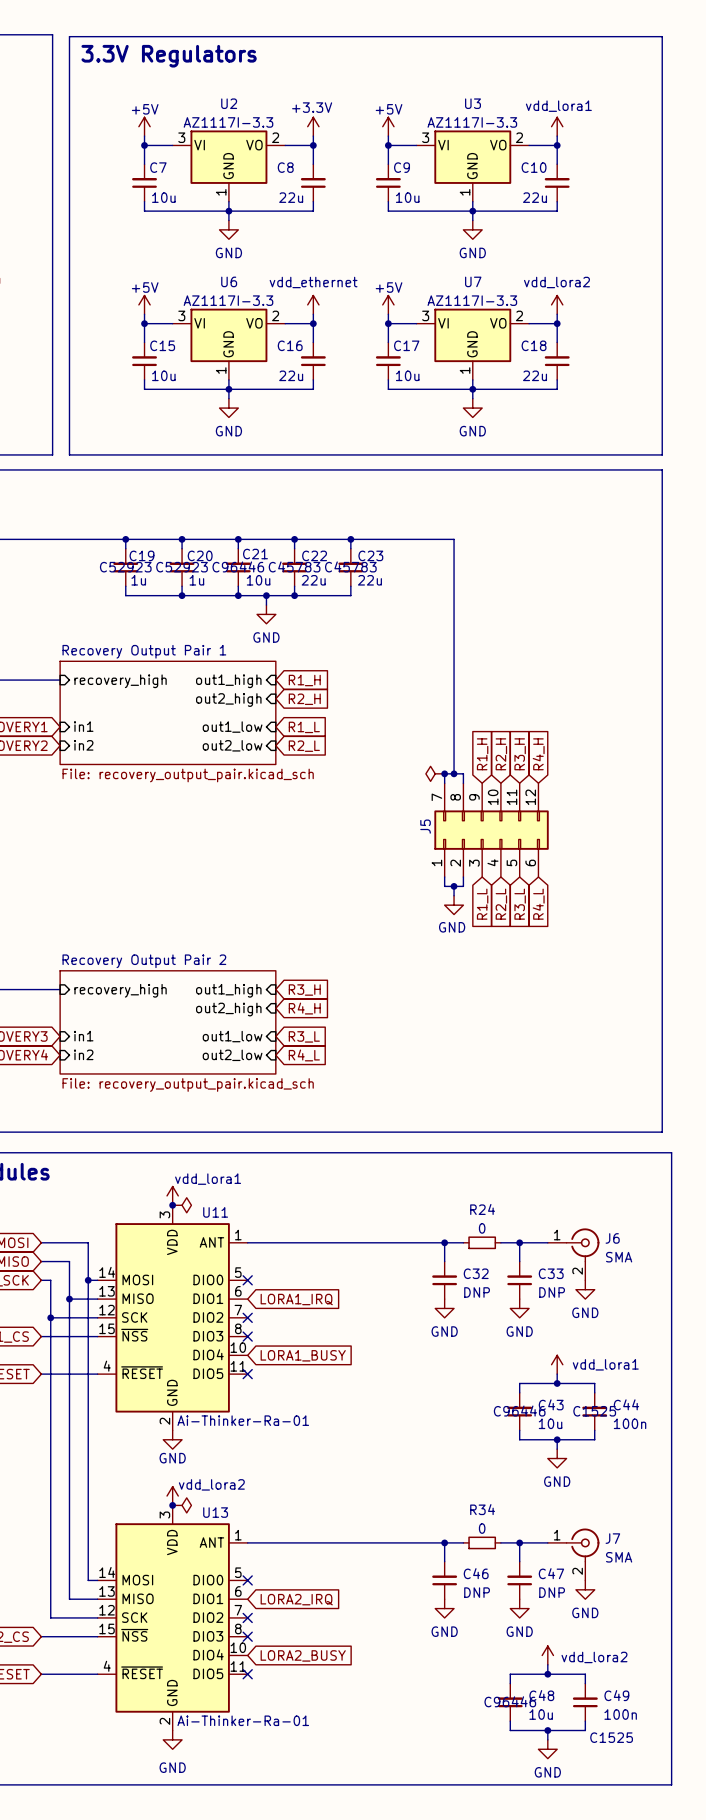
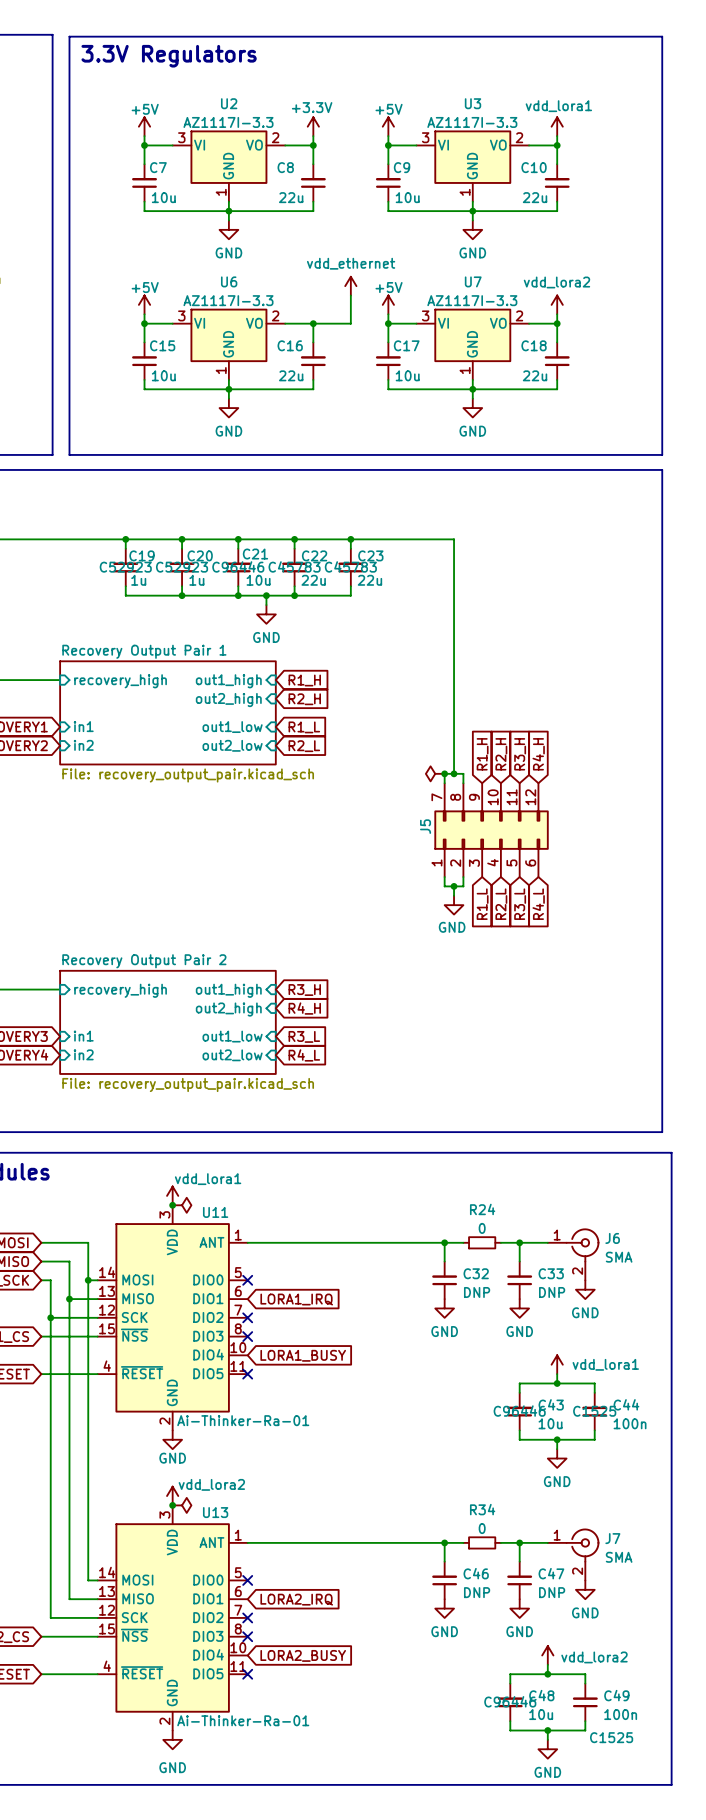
power symbol position: vdd_ethernet (313, 304) -> vdd_ethernet (350, 286)
wire: (313, 314) (313, 323) -> (350, 295) (350, 323) (313, 323)

